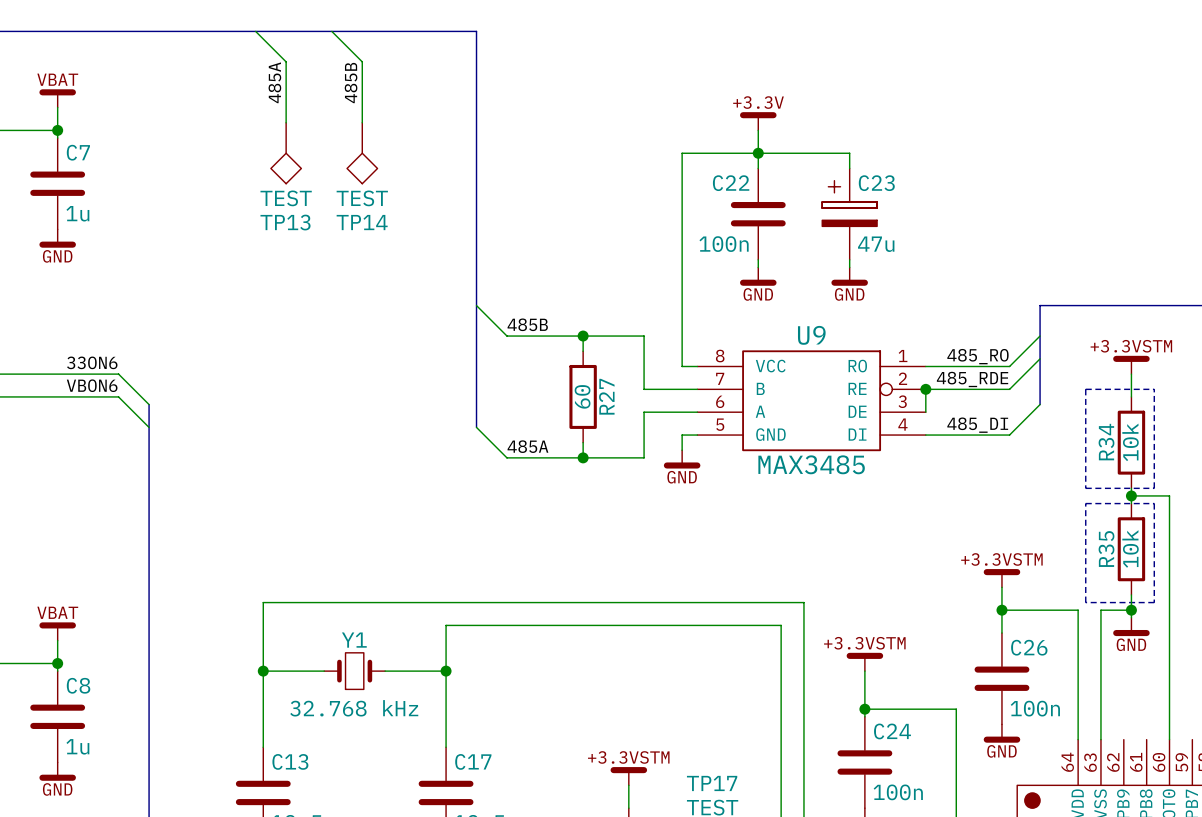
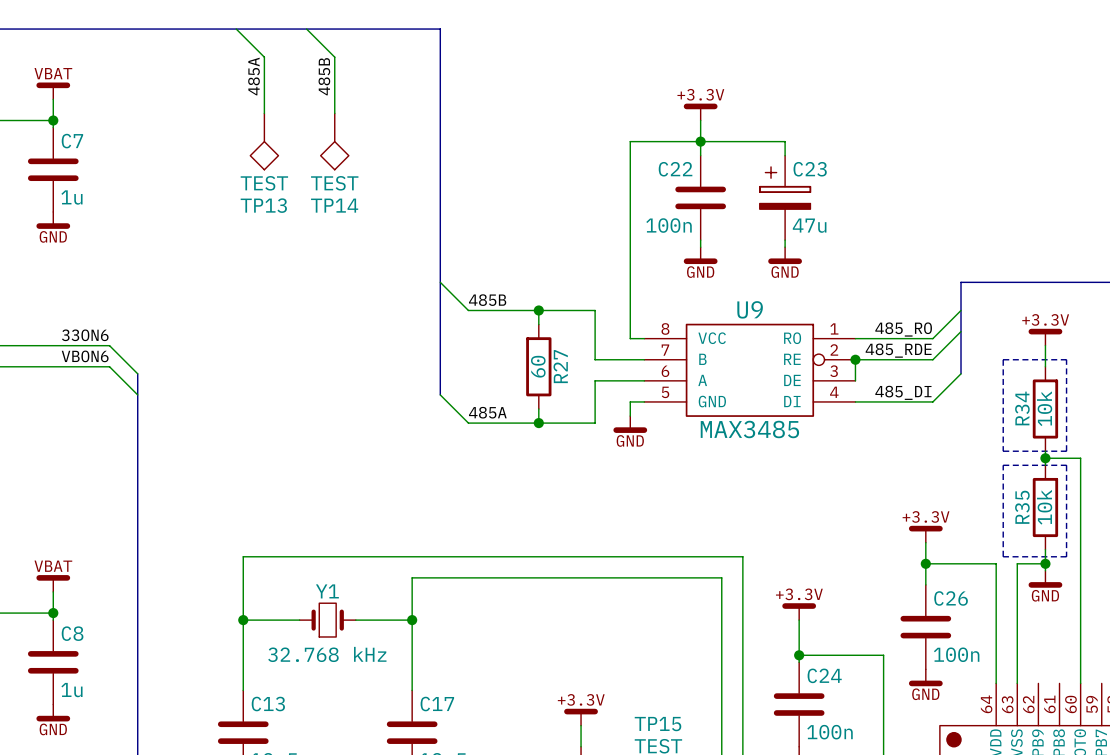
power symbol text: +3.3VSTM (1131, 346) -> +3.3V (1045, 319)
power symbol text: +3.3VSTM (1001, 559) -> +3.3V (926, 516)
power symbol text: +3.3VSTM (864, 643) -> +3.3V (799, 594)
power symbol text: +3.3VSTM (628, 757) -> +3.3V (581, 699)
TP17 name: TP17 (712, 783) -> TP15 (658, 724)

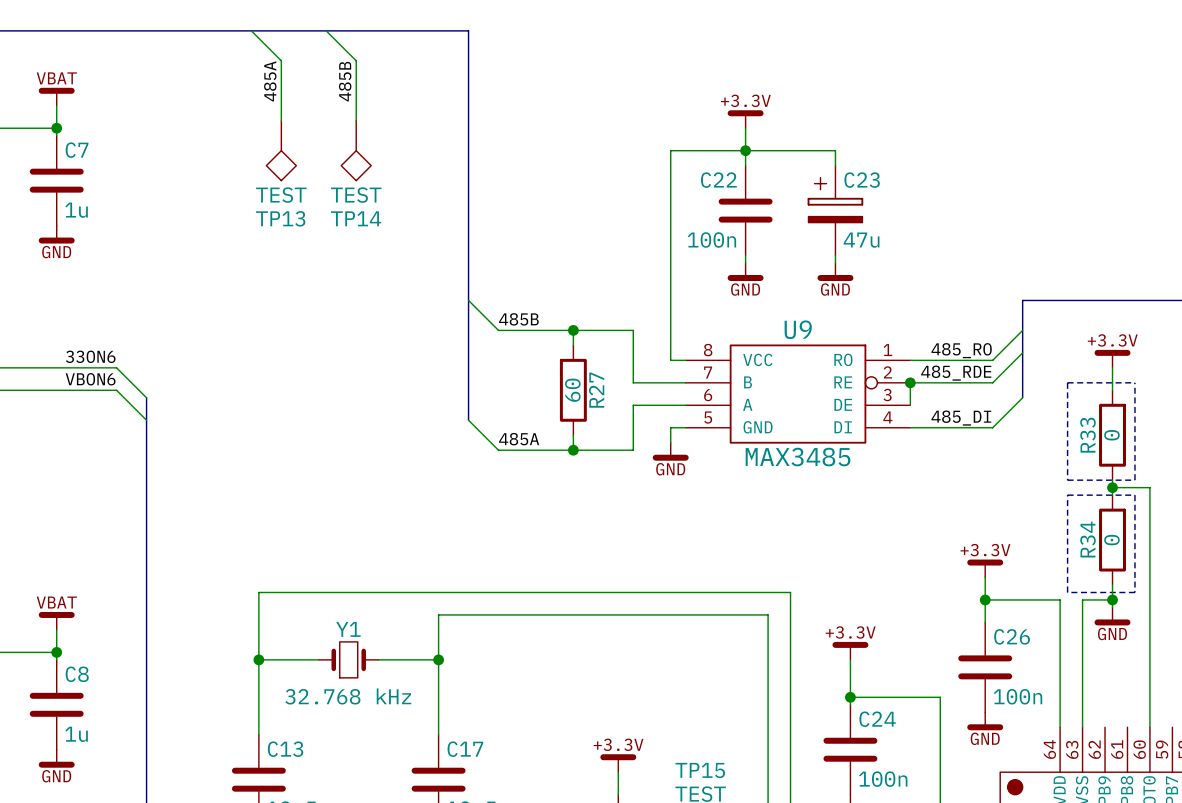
R34 name: R34 (1022, 408) -> R33 (1087, 435)
R34 value: 10k (1044, 408) -> 0 (1111, 435)
R35 name: R35 (1022, 507) -> R34 (1087, 539)
R35 value: 10k (1044, 507) -> 0 (1111, 540)

